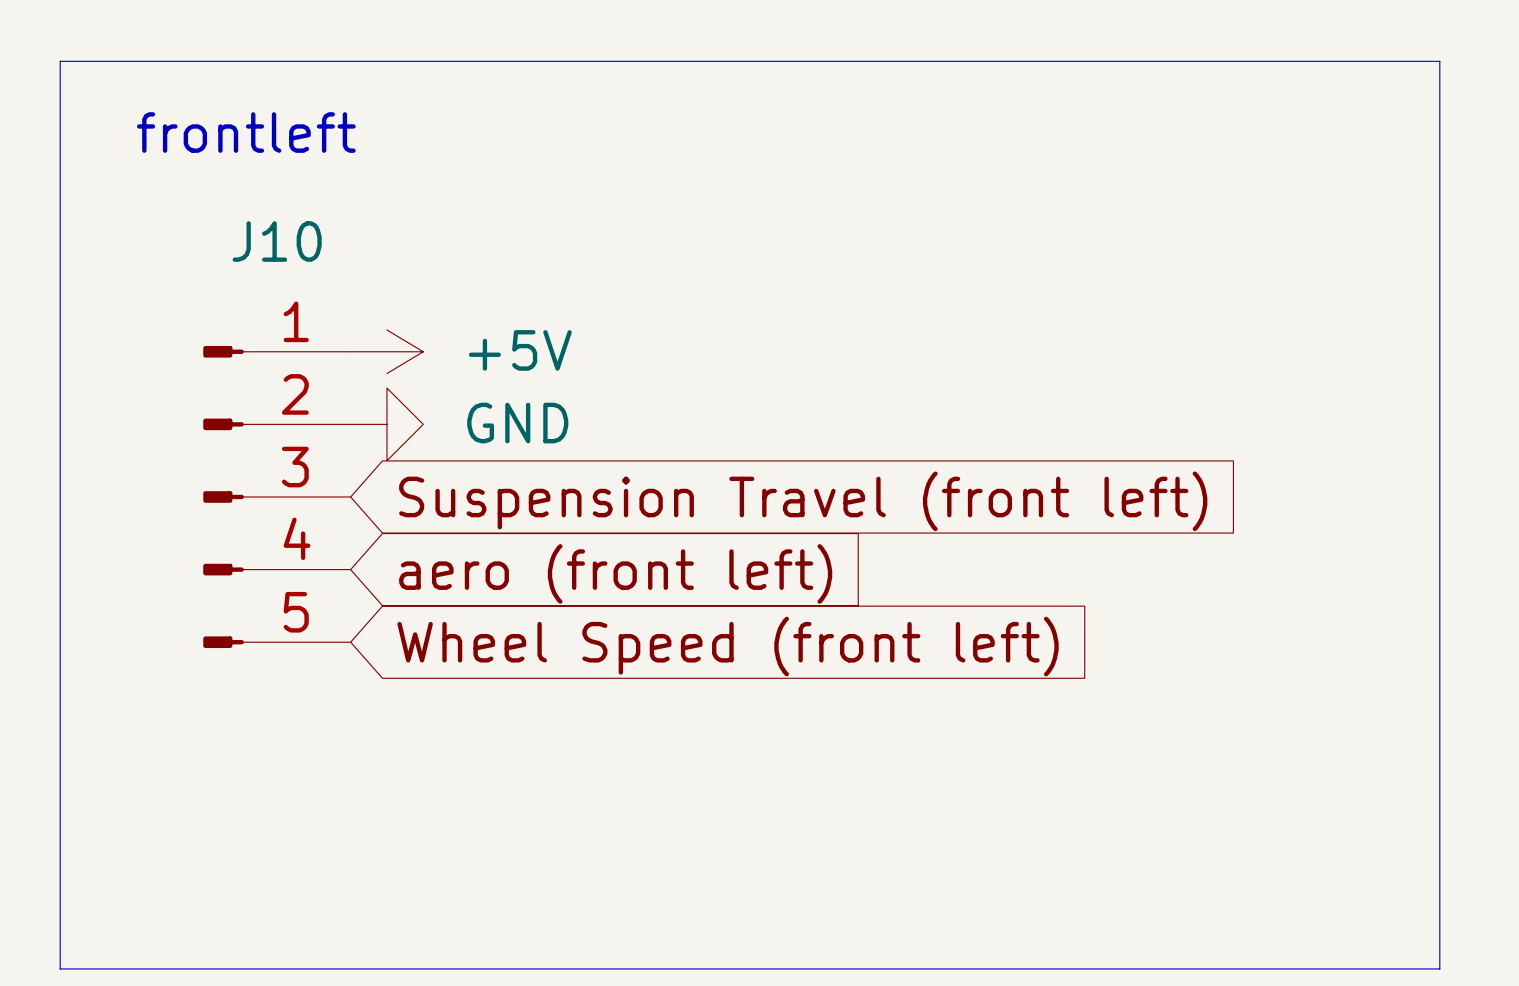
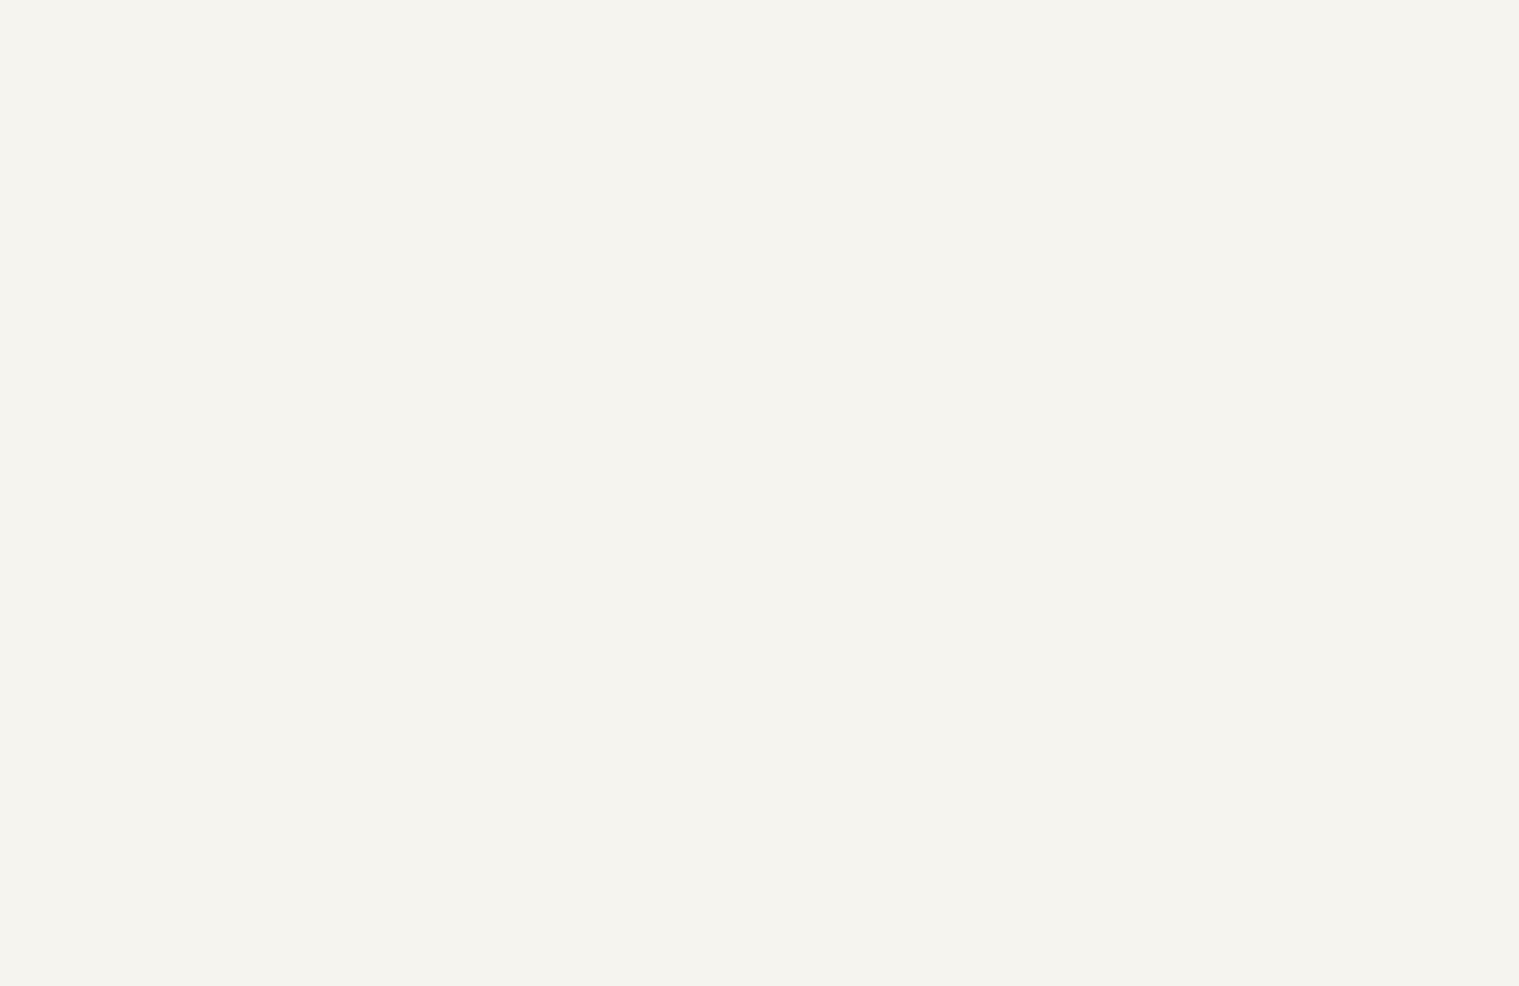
line: (60, 61) (1439, 61) (1439, 968) (60, 968) (60, 61) -> none
text: frontleft (246, 132) -> none
power symbol: +5V (386, 351) -> none
power symbol: GND (386, 424) -> none
J10: (276, 496) -> none
global label: Suspension Travel (front left) (803, 501) -> none
global label: aero (front left) (615, 573) -> none
global label: Wheel Speed (front left) (728, 646) -> none

